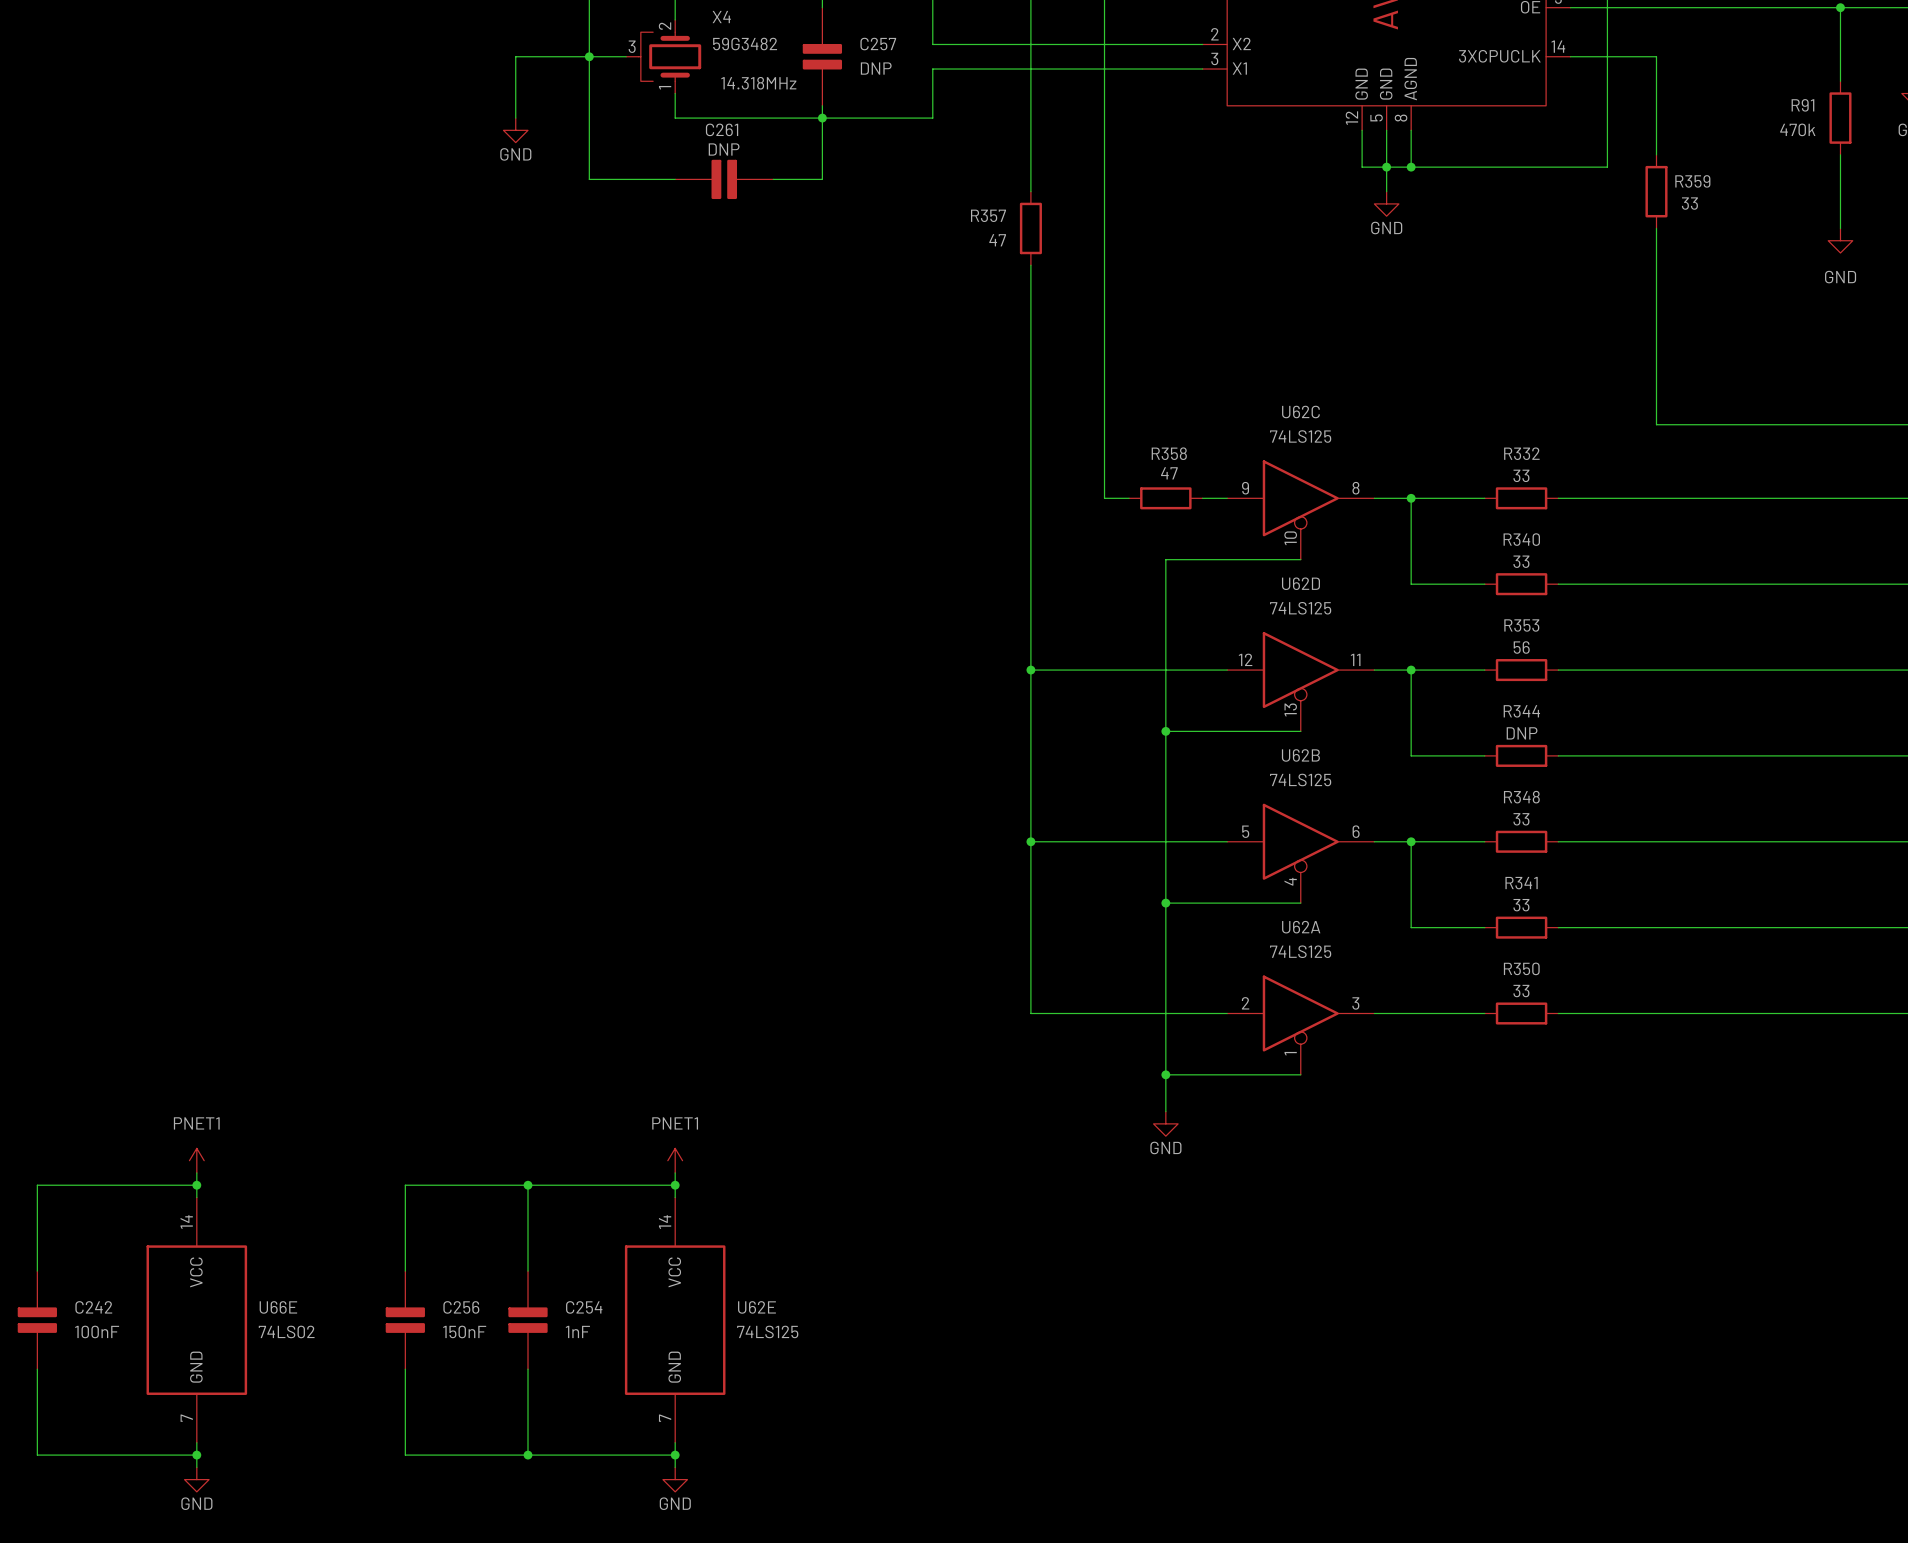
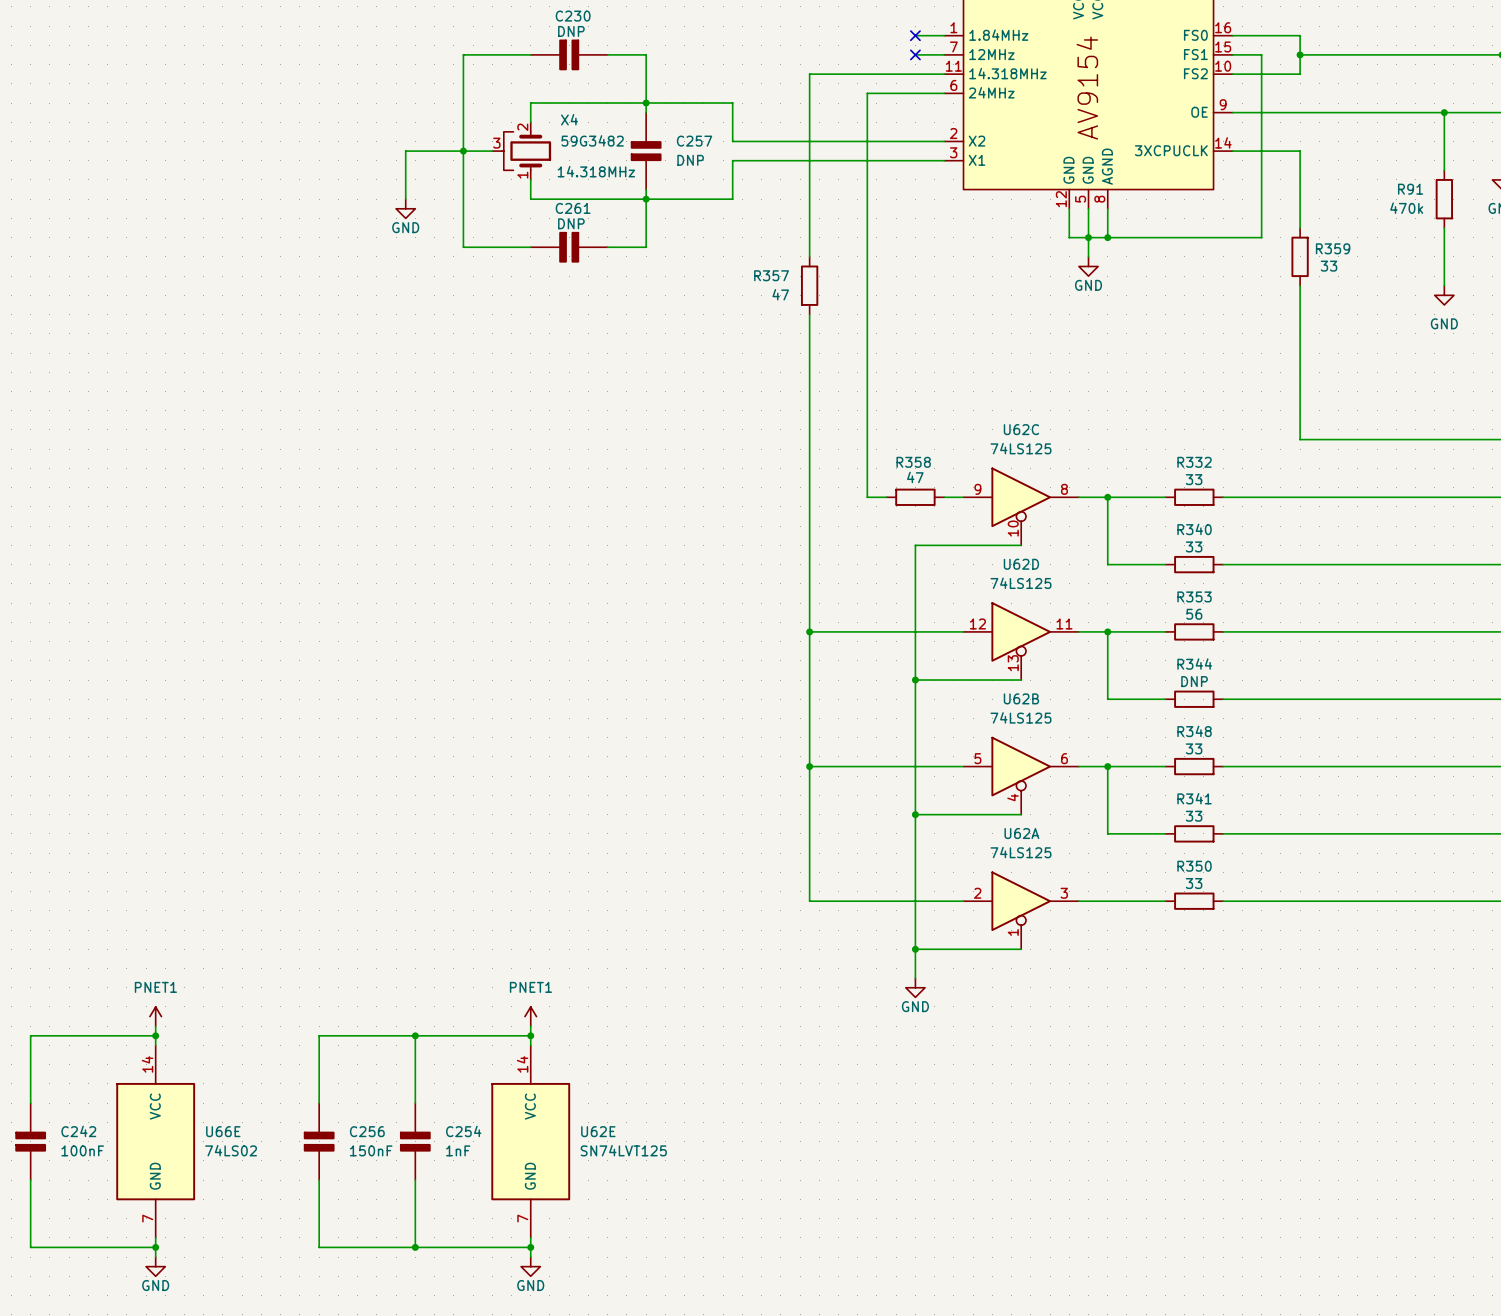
U62E value: 74LS125 (767, 1331) -> SN74LVT125 (623, 1150)

